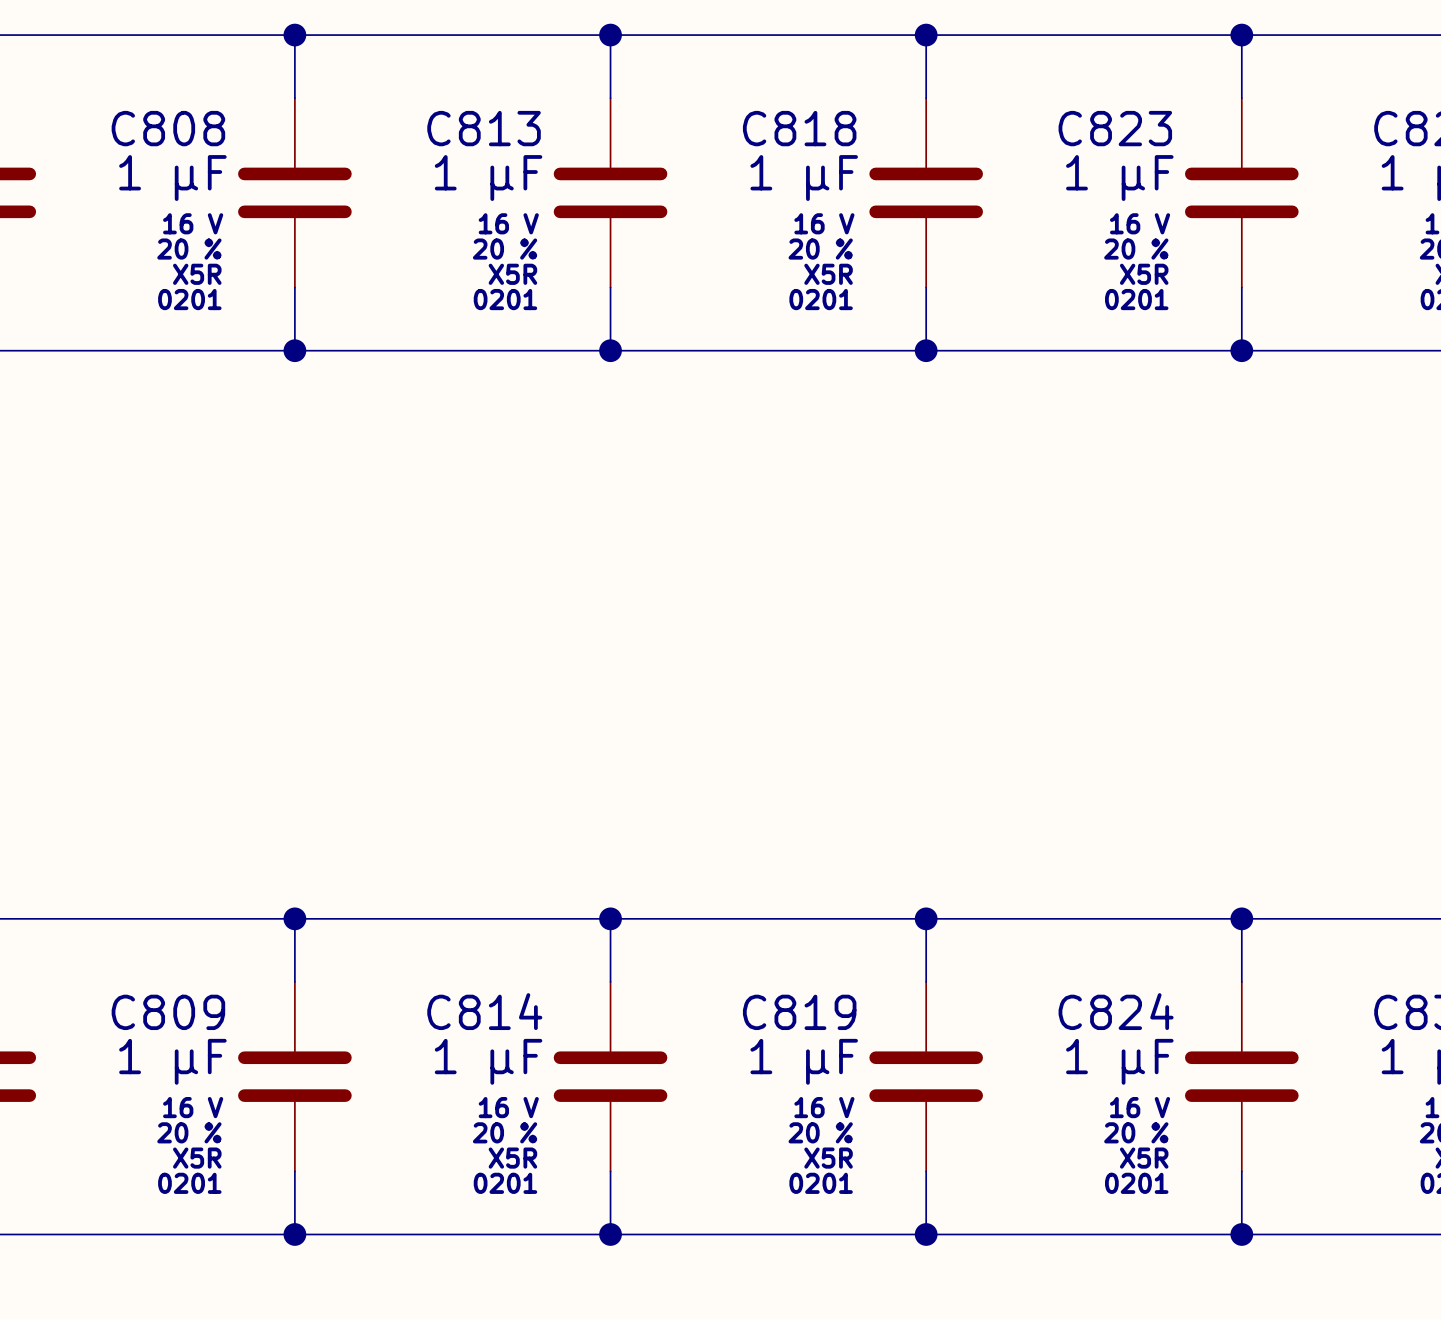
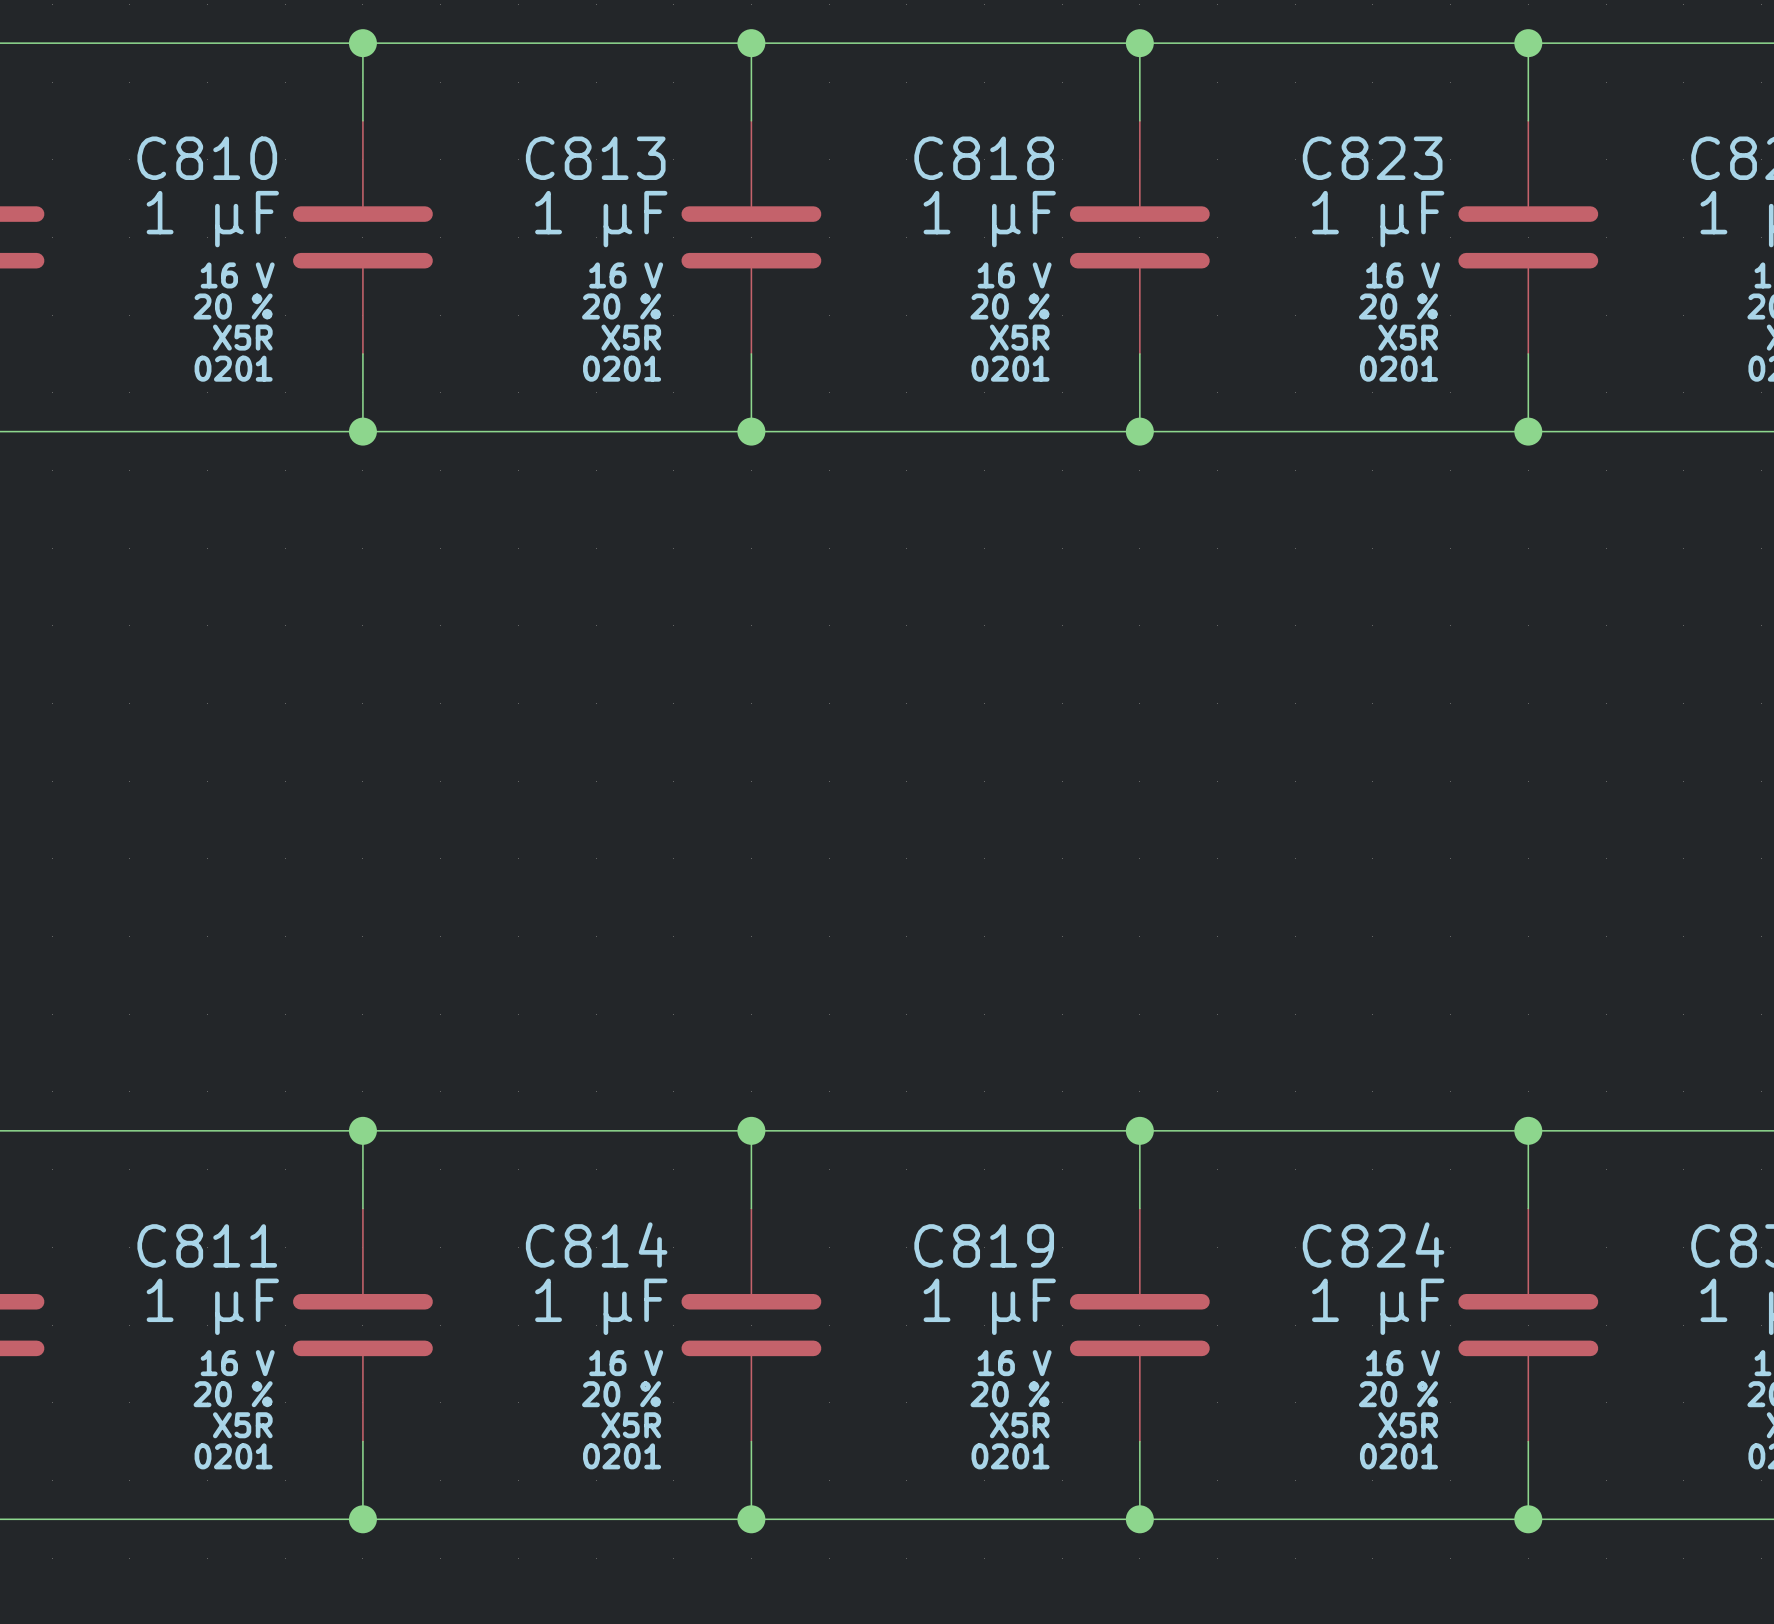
C808 name: C808 (168, 128) -> C810 (207, 158)
C809 name: C809 (168, 1012) -> C811 (207, 1245)

